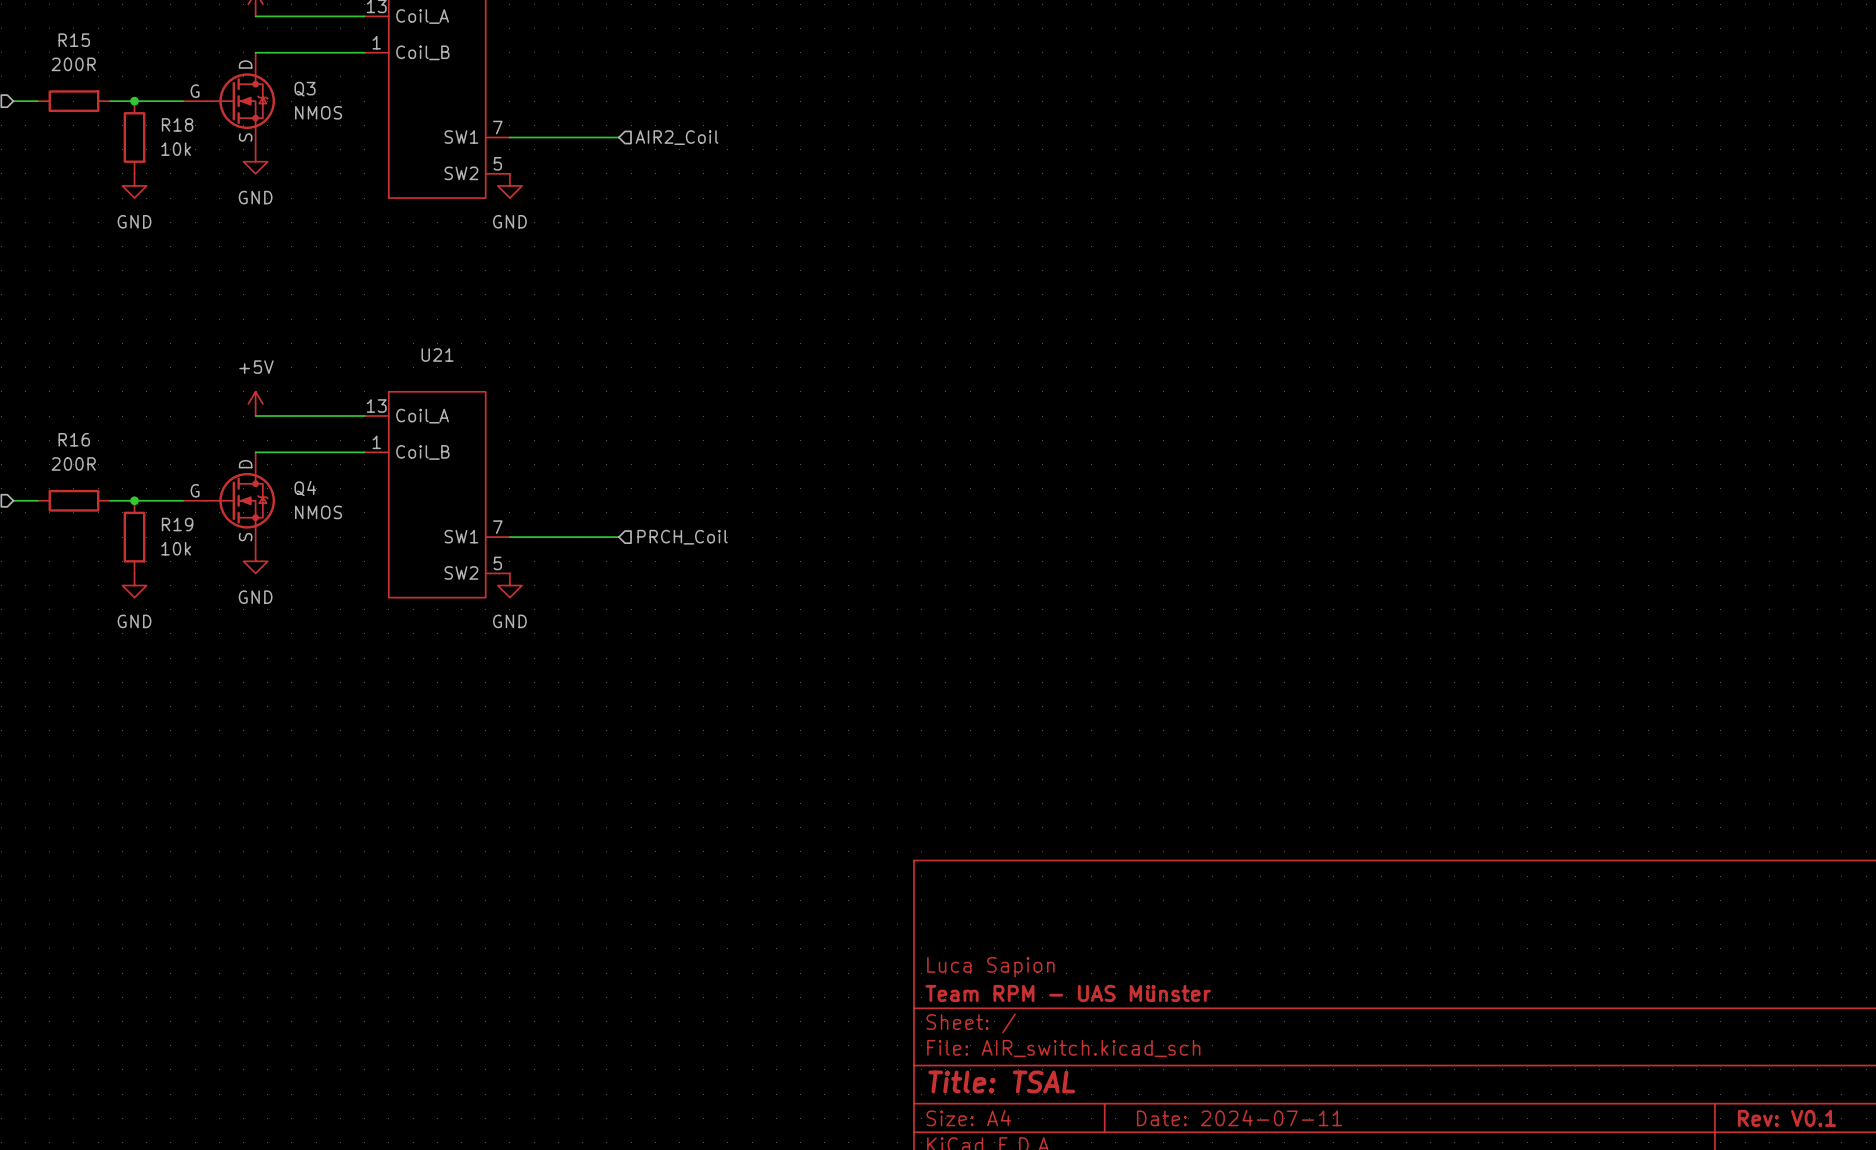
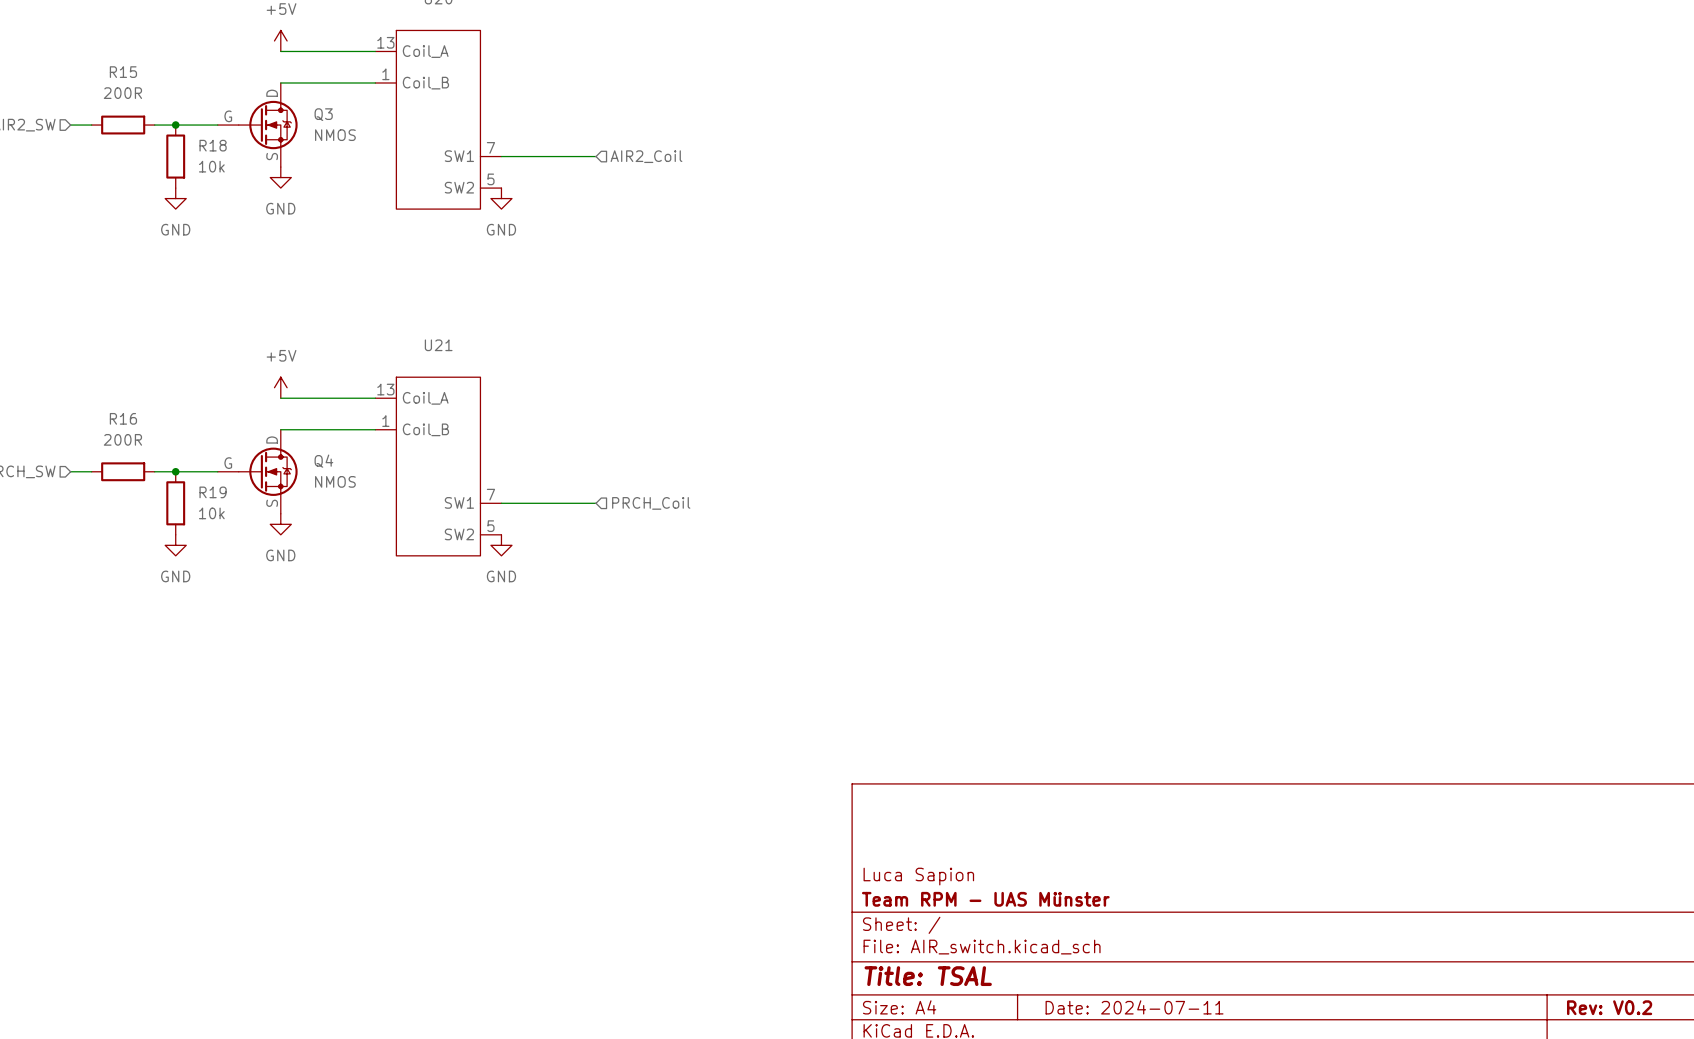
title block: Rev: V0.1 (1786, 1118) -> Rev: V0.2 (1609, 1007)

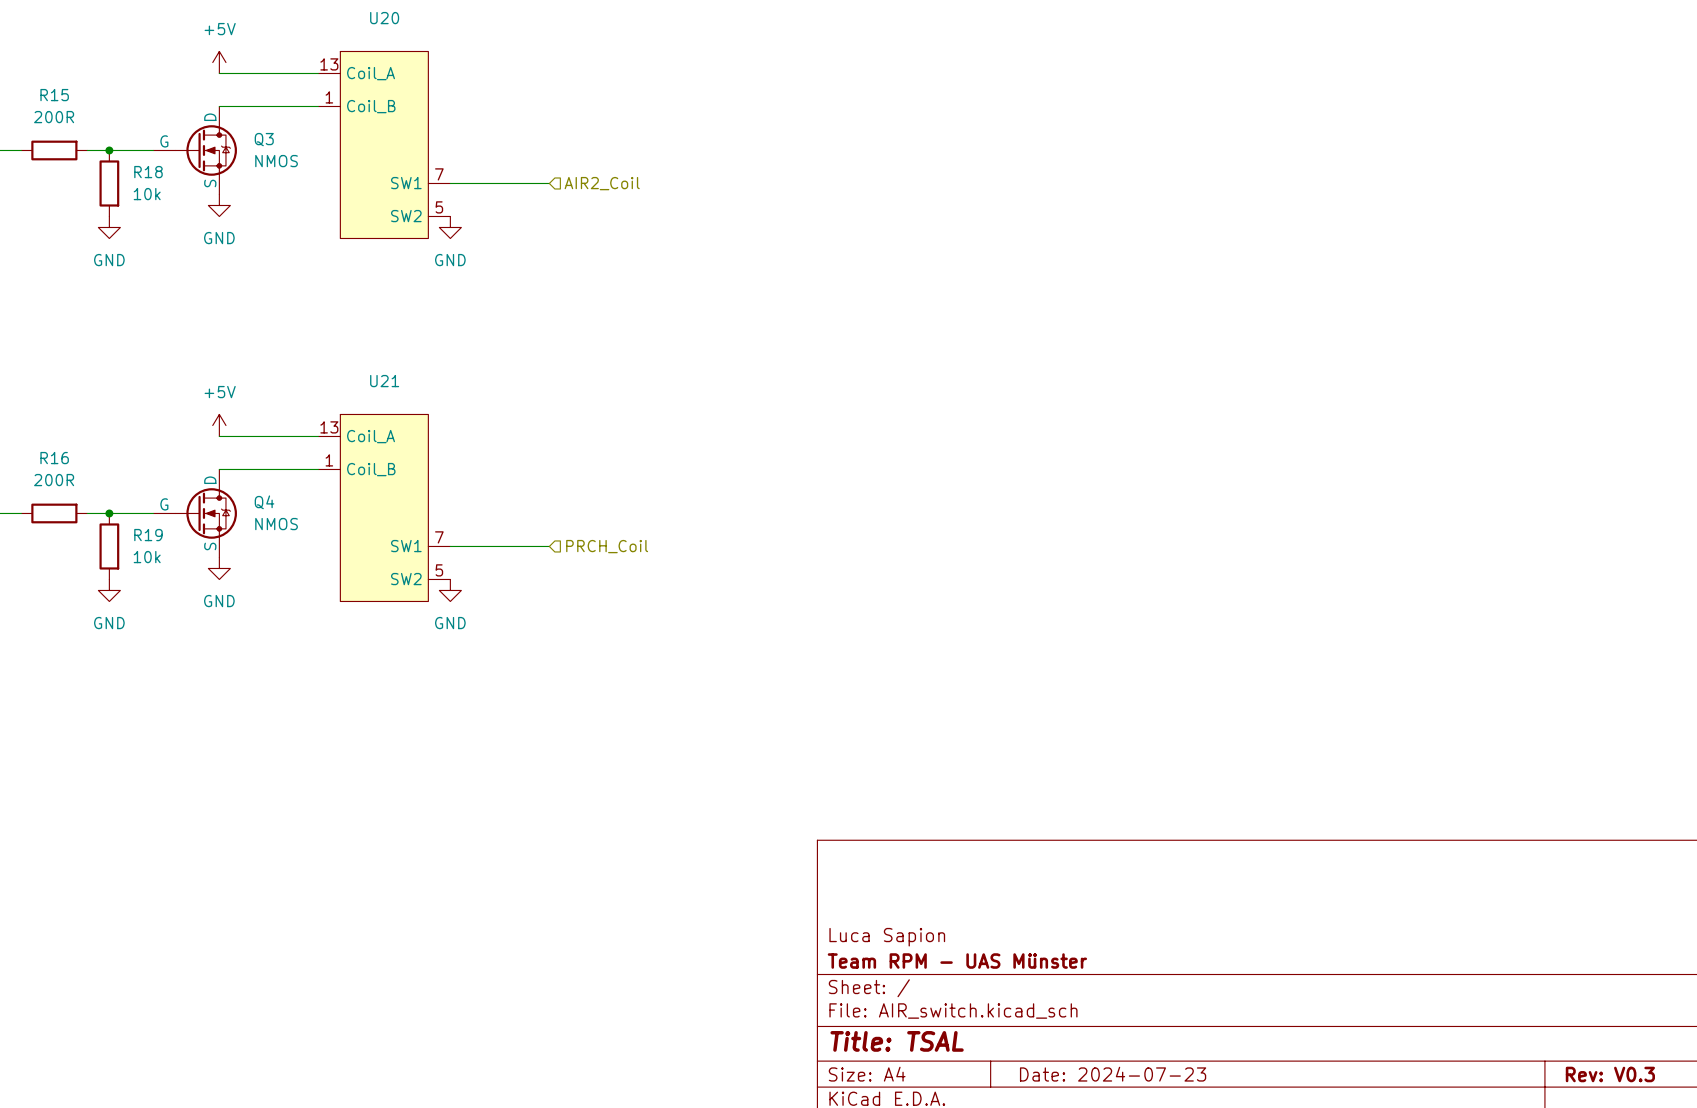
title block: Date: 2024-07-11 (1134, 1007) -> Date: 2024-07-23 (1113, 1074)
title block: Rev: V0.2 (1609, 1007) -> Rev: V0.3 (1610, 1074)

